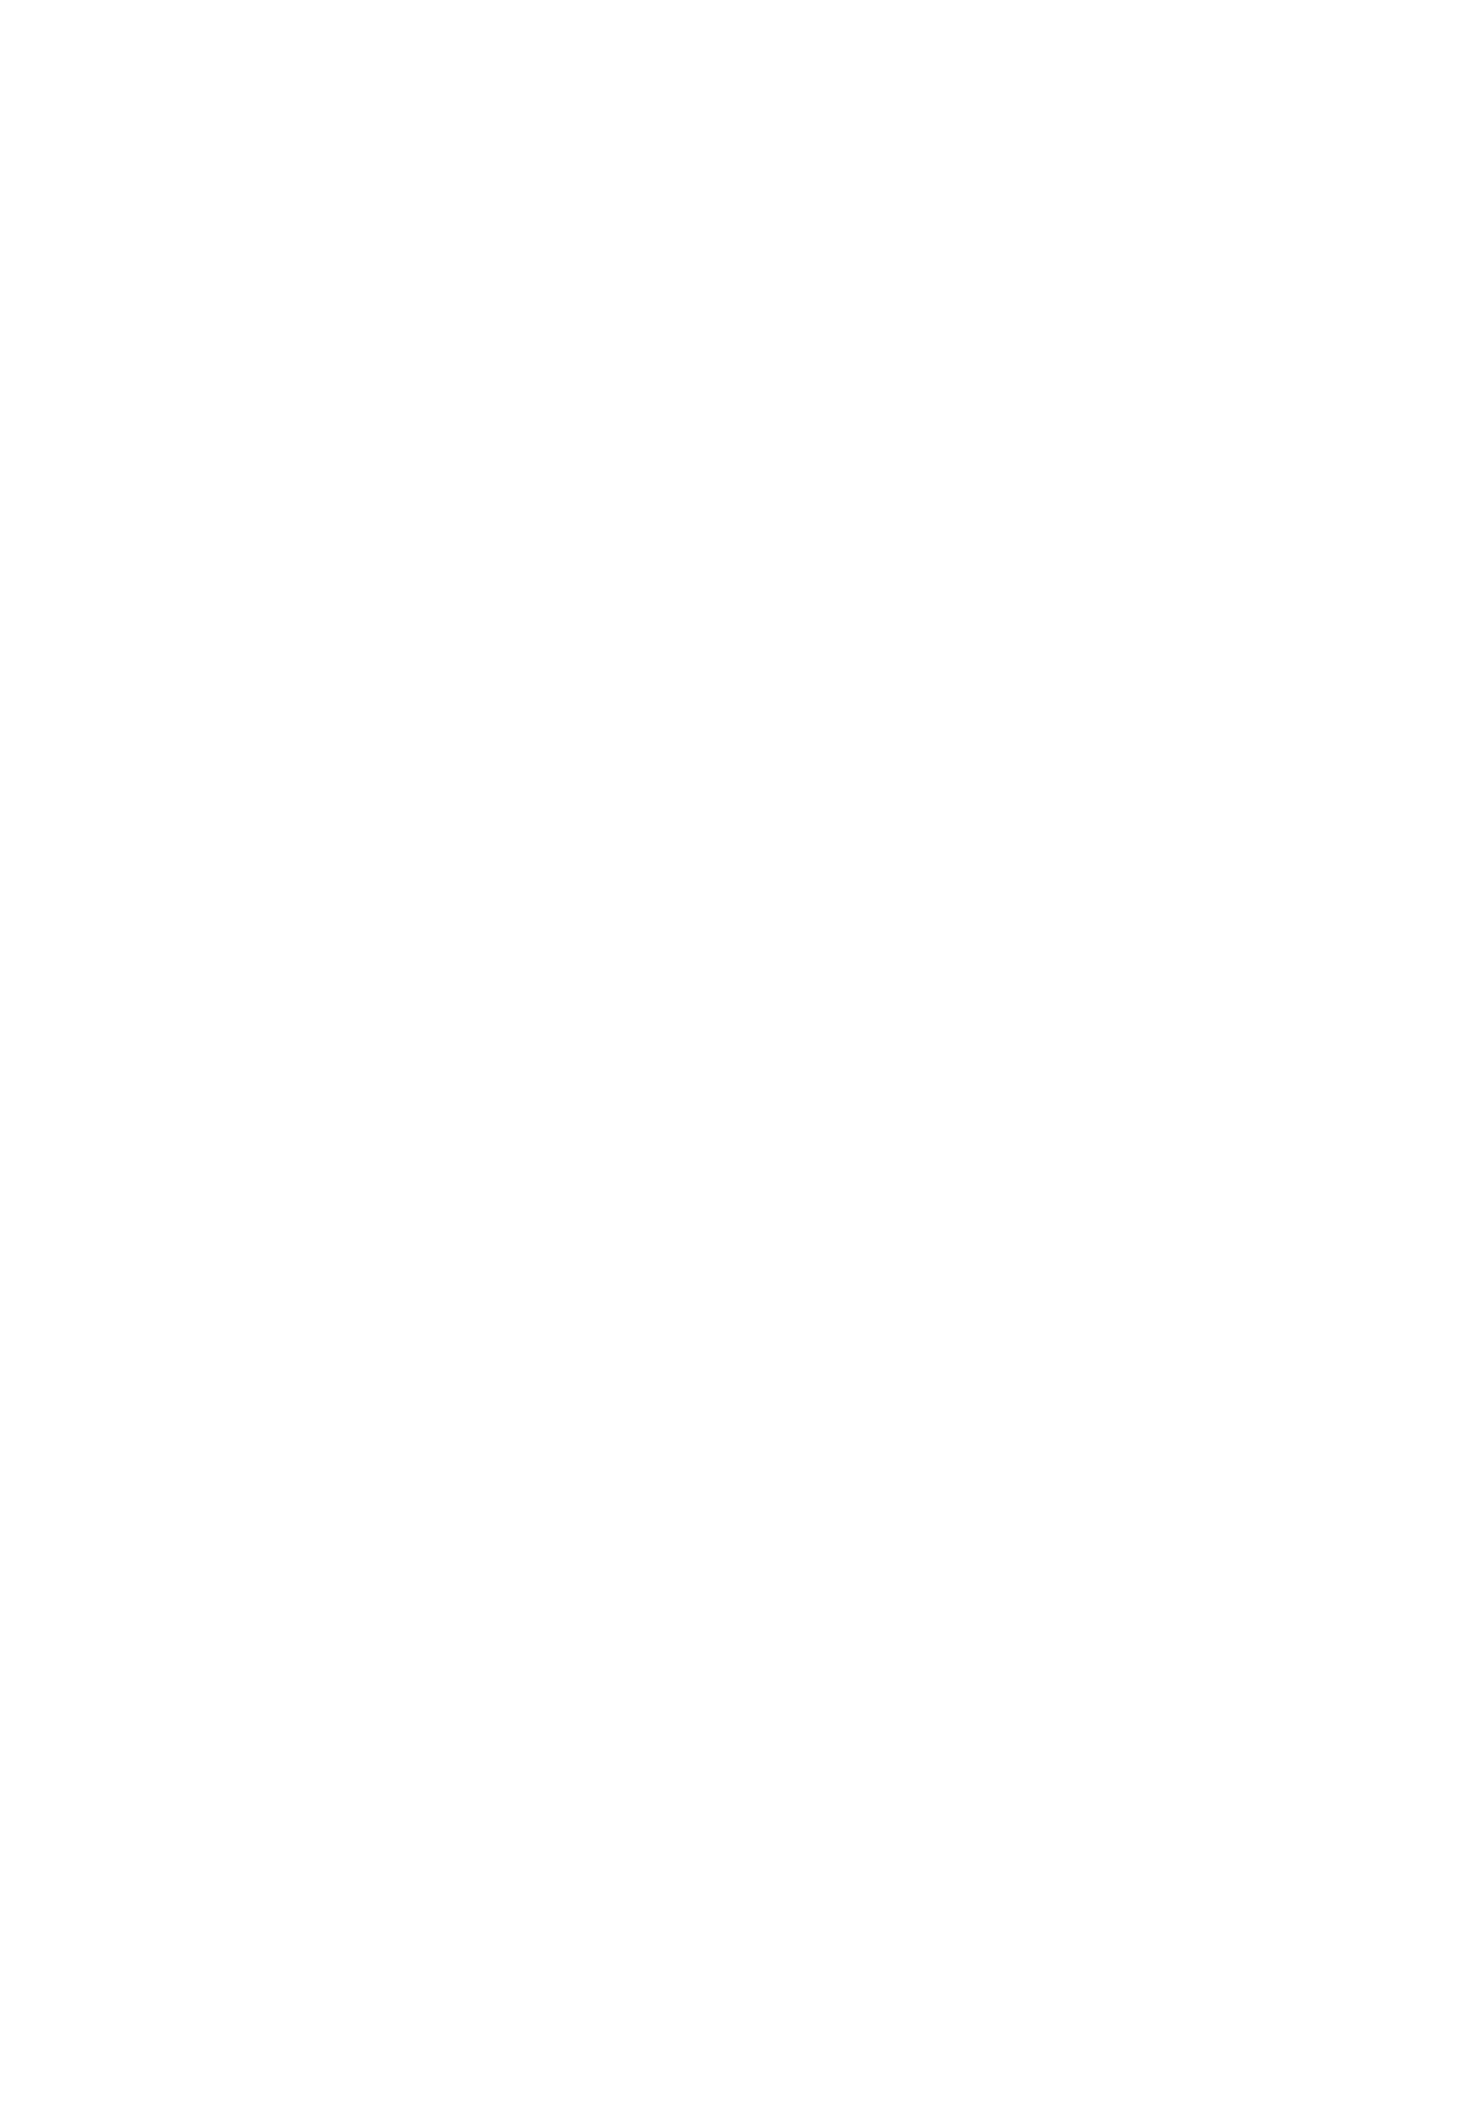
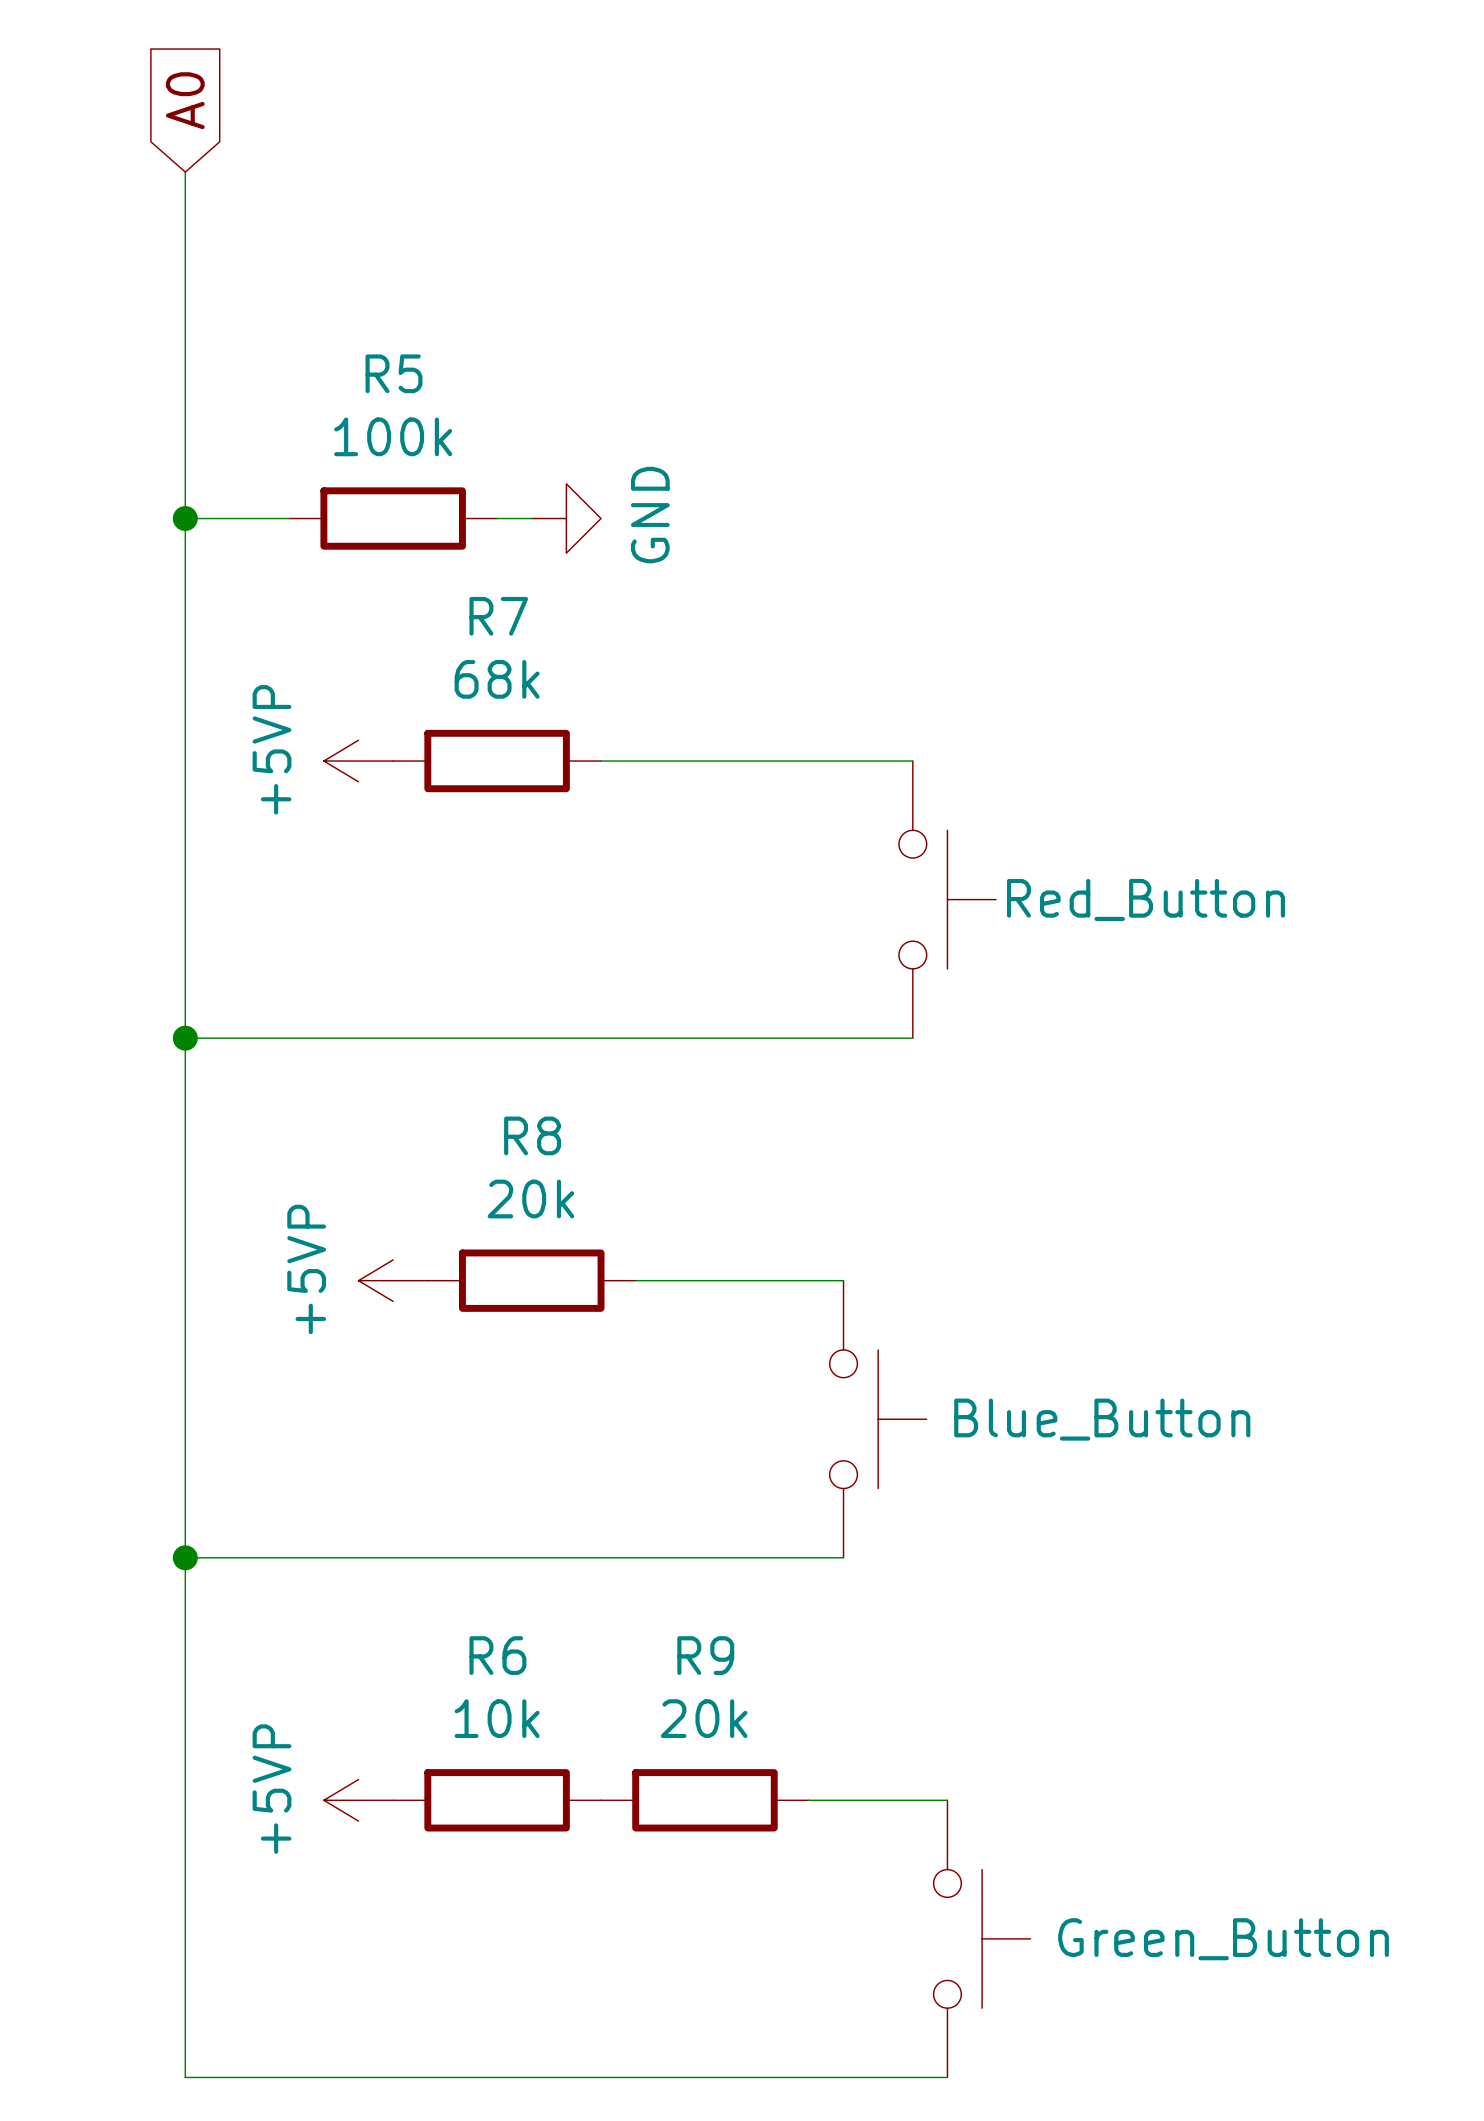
global label: none -> A0 (185, 100)
wire: none -> (185, 172) (185, 2077) (947, 2077)
wire: none -> (185, 518) (289, 518)
junction: none -> (185, 518)
R5: none -> 100k (393, 518)
wire: none -> (497, 518) (531, 518)
power symbol: none -> GND (566, 518)
power symbol: none -> +5VP (358, 761)
R7: none -> 68k (497, 761)
wire: none -> (601, 761) (912, 761)
part: none -> Red_Button (947, 899)
wire: none -> (185, 1038) (912, 1038)
junction: none -> (185, 1038)
power symbol: none -> +5VP (393, 1280)
R8: none -> 20k (531, 1280)
wire: none -> (635, 1280) (843, 1280)
part: none -> Blue_Button (878, 1419)
wire: none -> (185, 1557) (843, 1557)
junction: none -> (185, 1557)
power symbol: none -> +5VP (358, 1800)
R6: none -> 10k (497, 1800)
R9: none -> 20k (704, 1800)
wire: none -> (808, 1800) (947, 1800)
part: none -> Green_Button (982, 1938)

